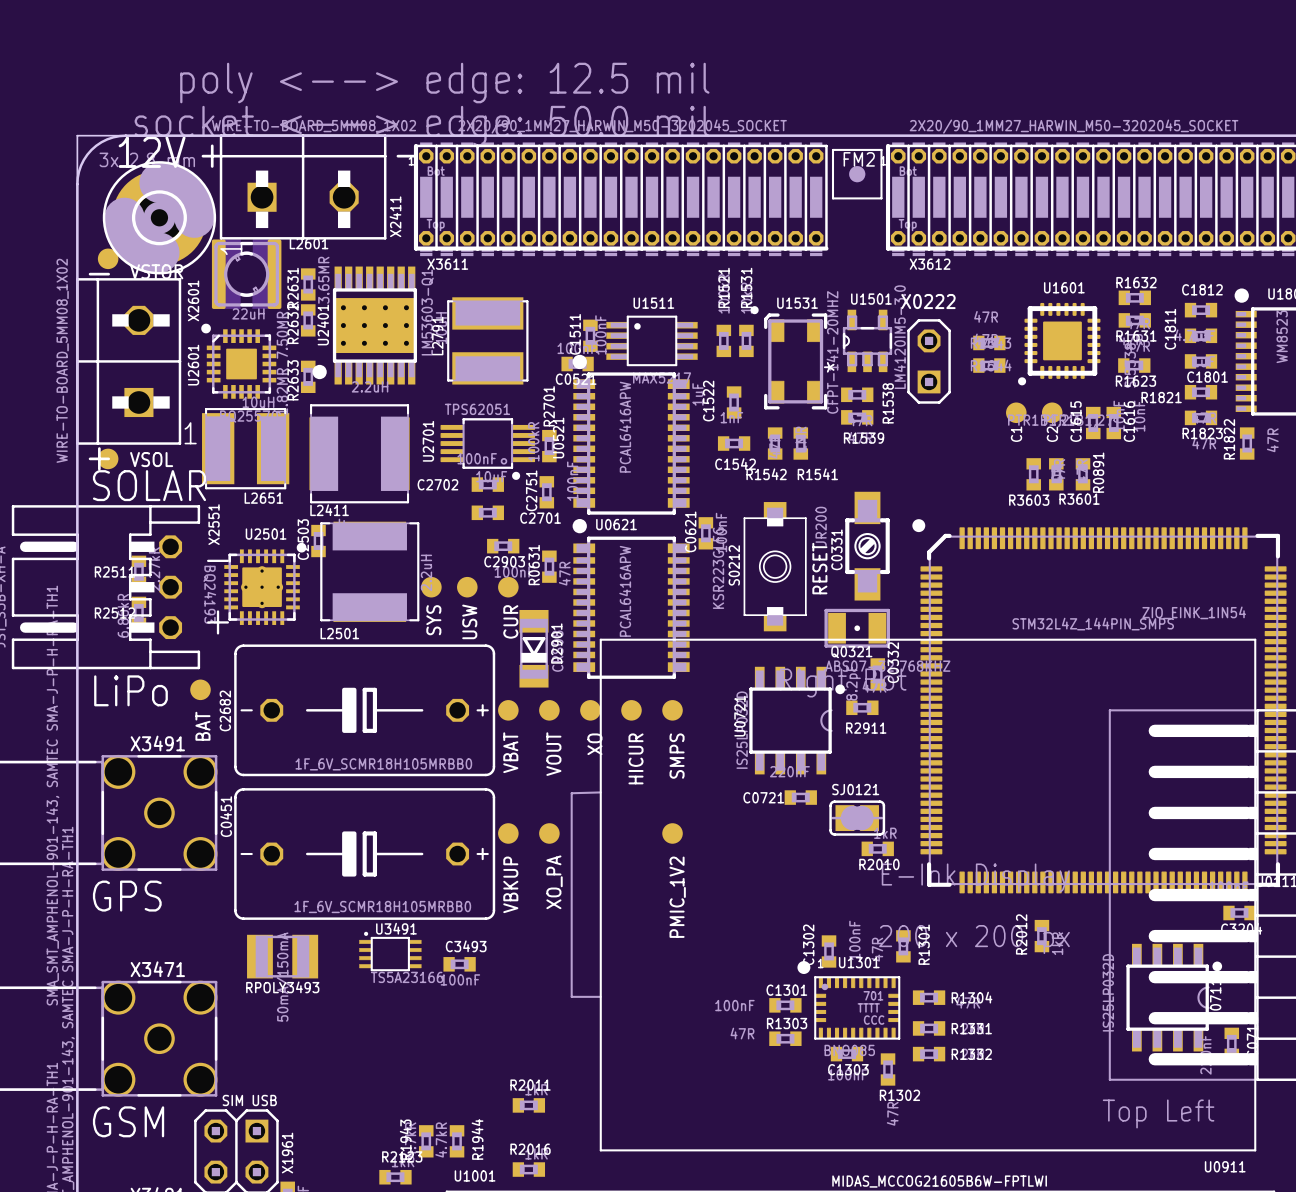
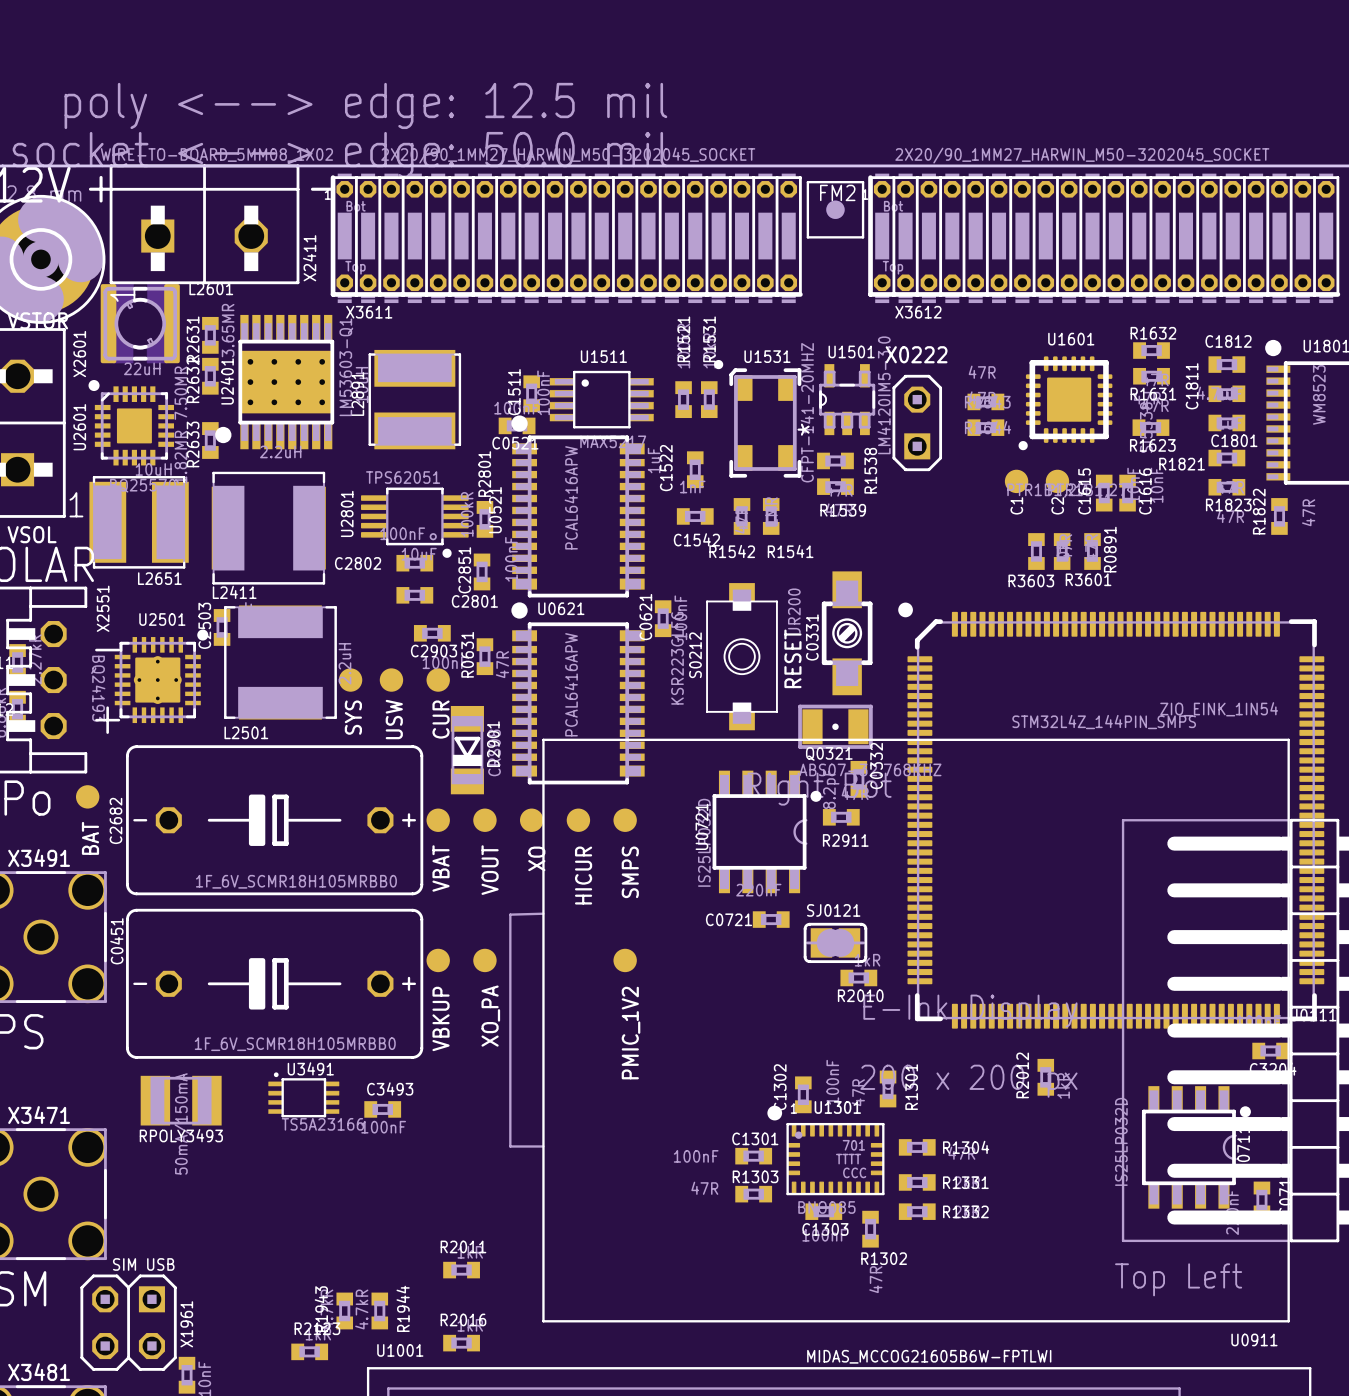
L2791 name: L2791 (437, 336) -> L2891 (357, 394)
R2701 name: R2701 (549, 406) -> R2801 (484, 474)
U2701 name: U2701 (428, 441) -> U2801 (347, 513)
C2702 name: C2702 (437, 484) -> C2802 (358, 563)
C2751 name: C2751 (531, 490) -> C2851 (464, 570)
C2701 name: C2701 (540, 518) -> C2801 (474, 601)

